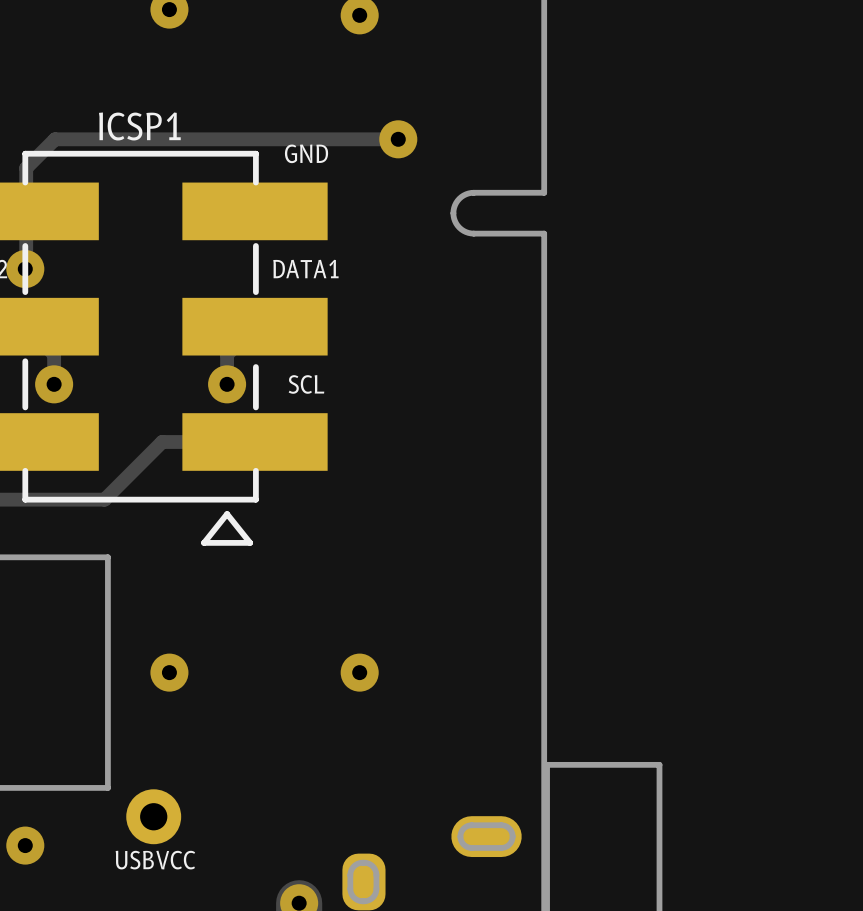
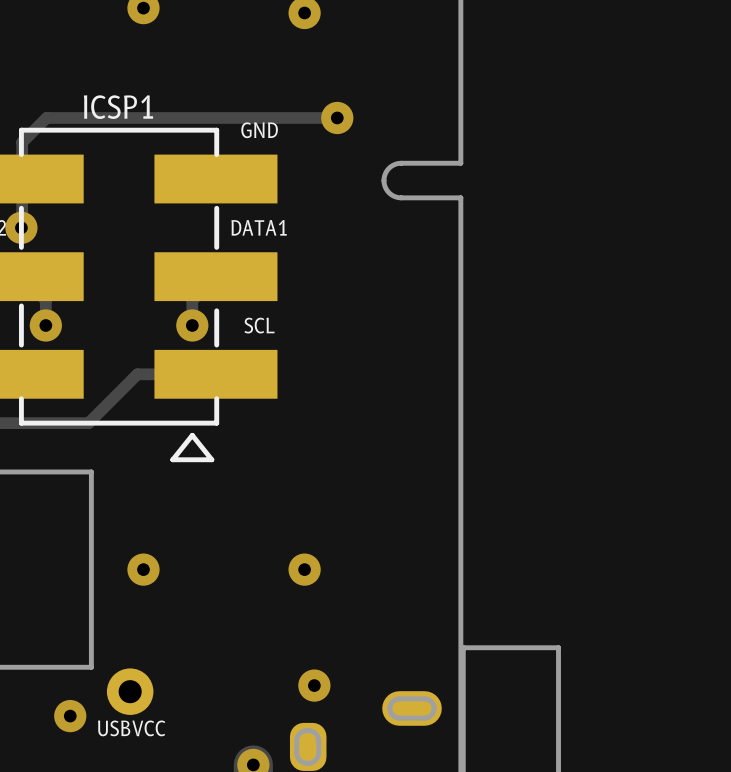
via: none -> (314, 685)
via position: (25, 845) -> (70, 716)

